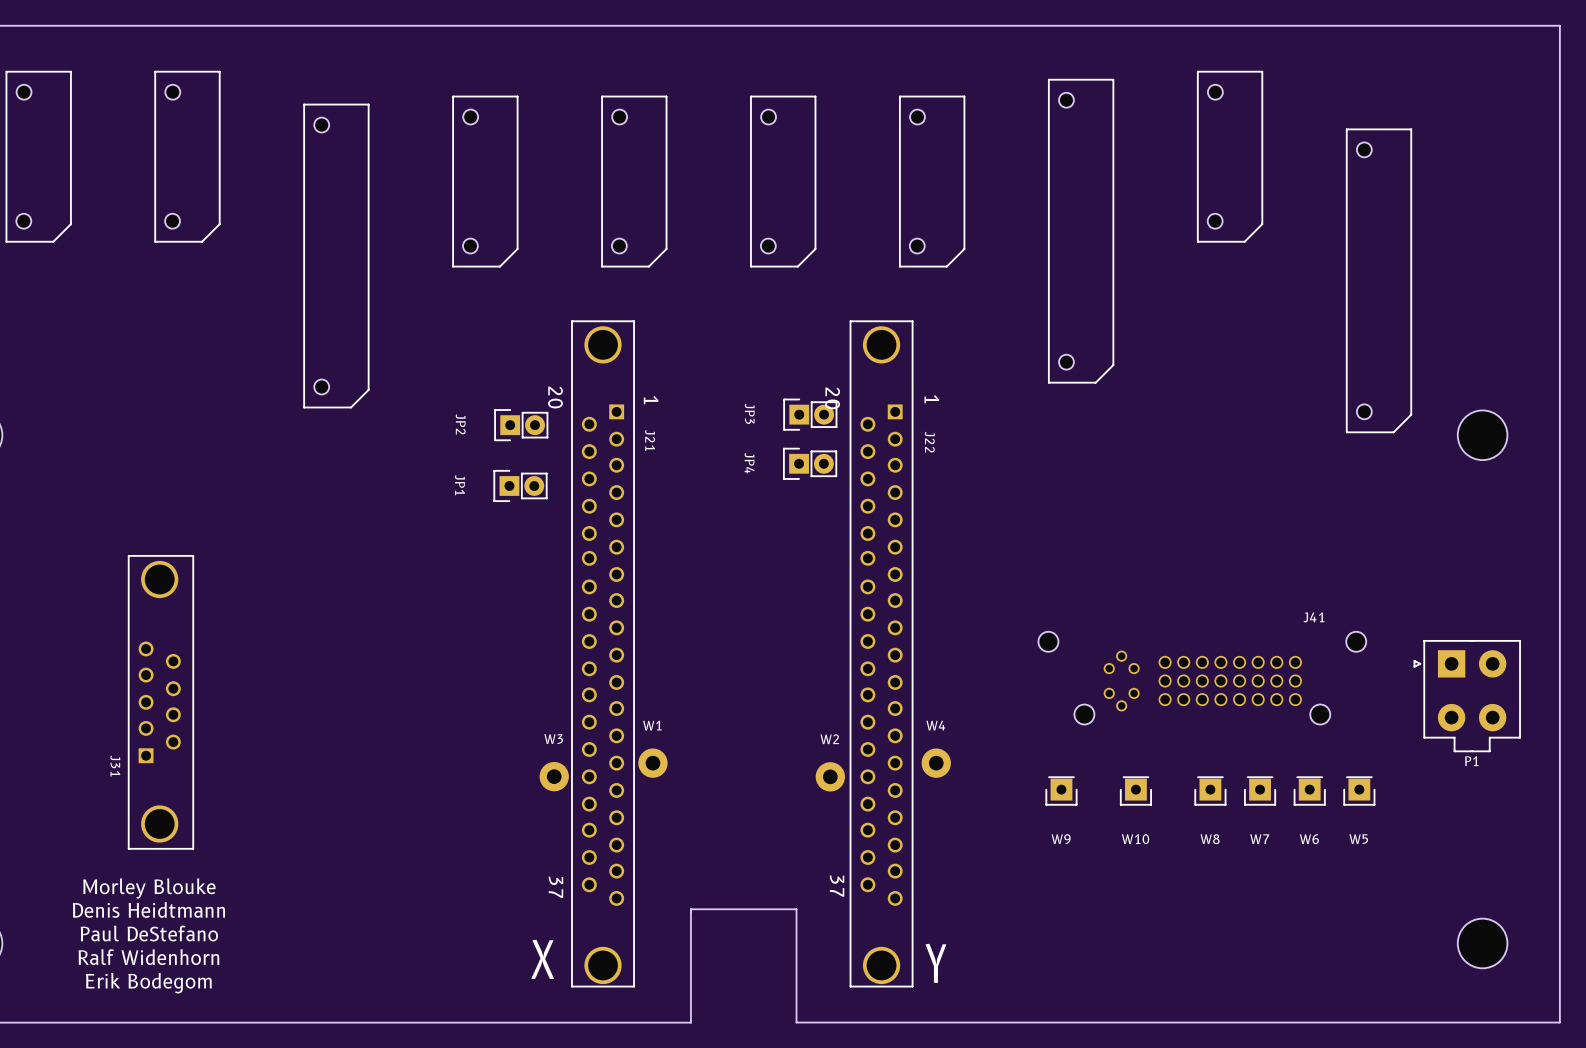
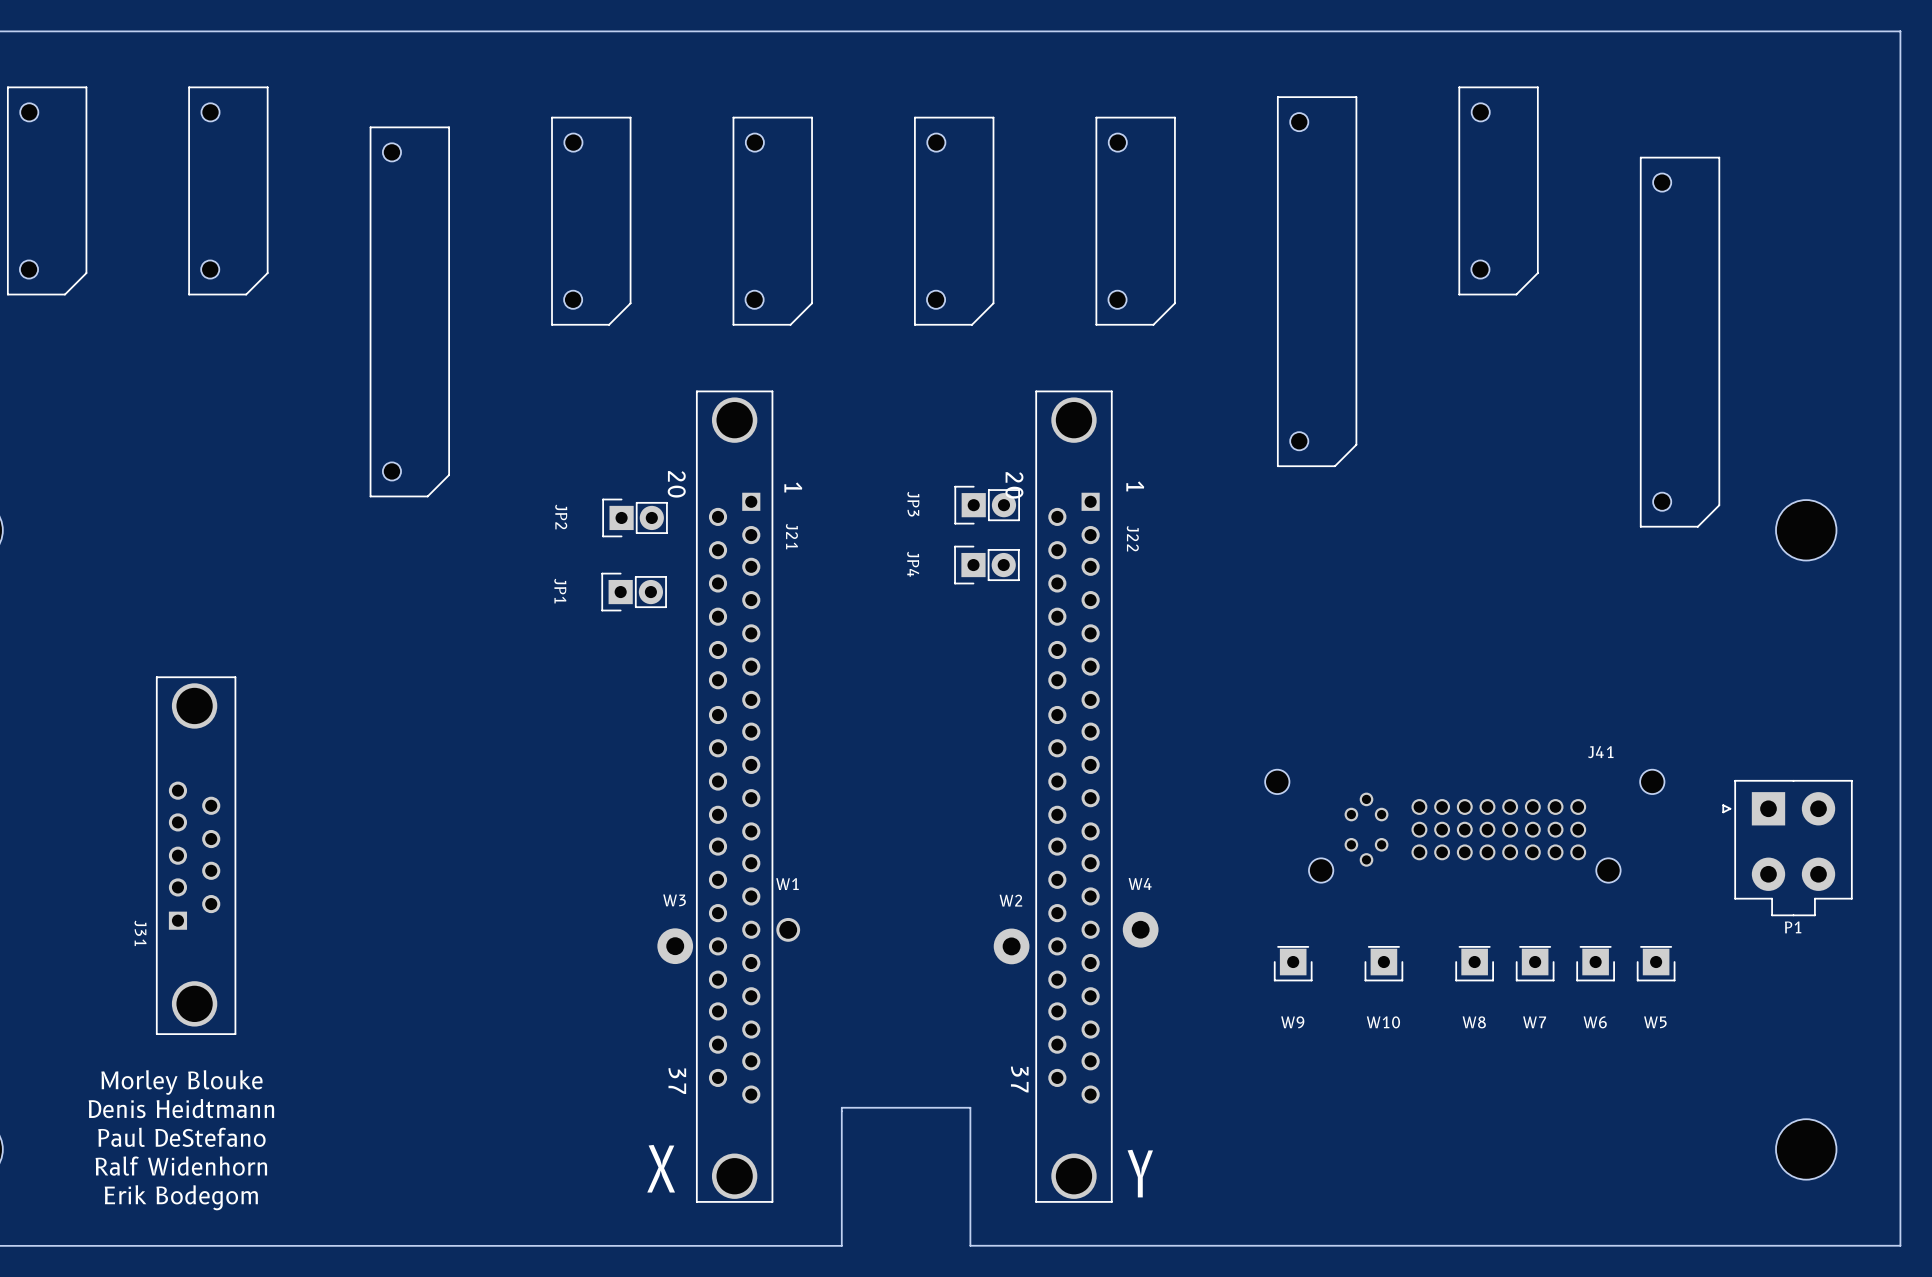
W1 footprint: [638, 748, 668, 778] -> [776, 917, 801, 942]

